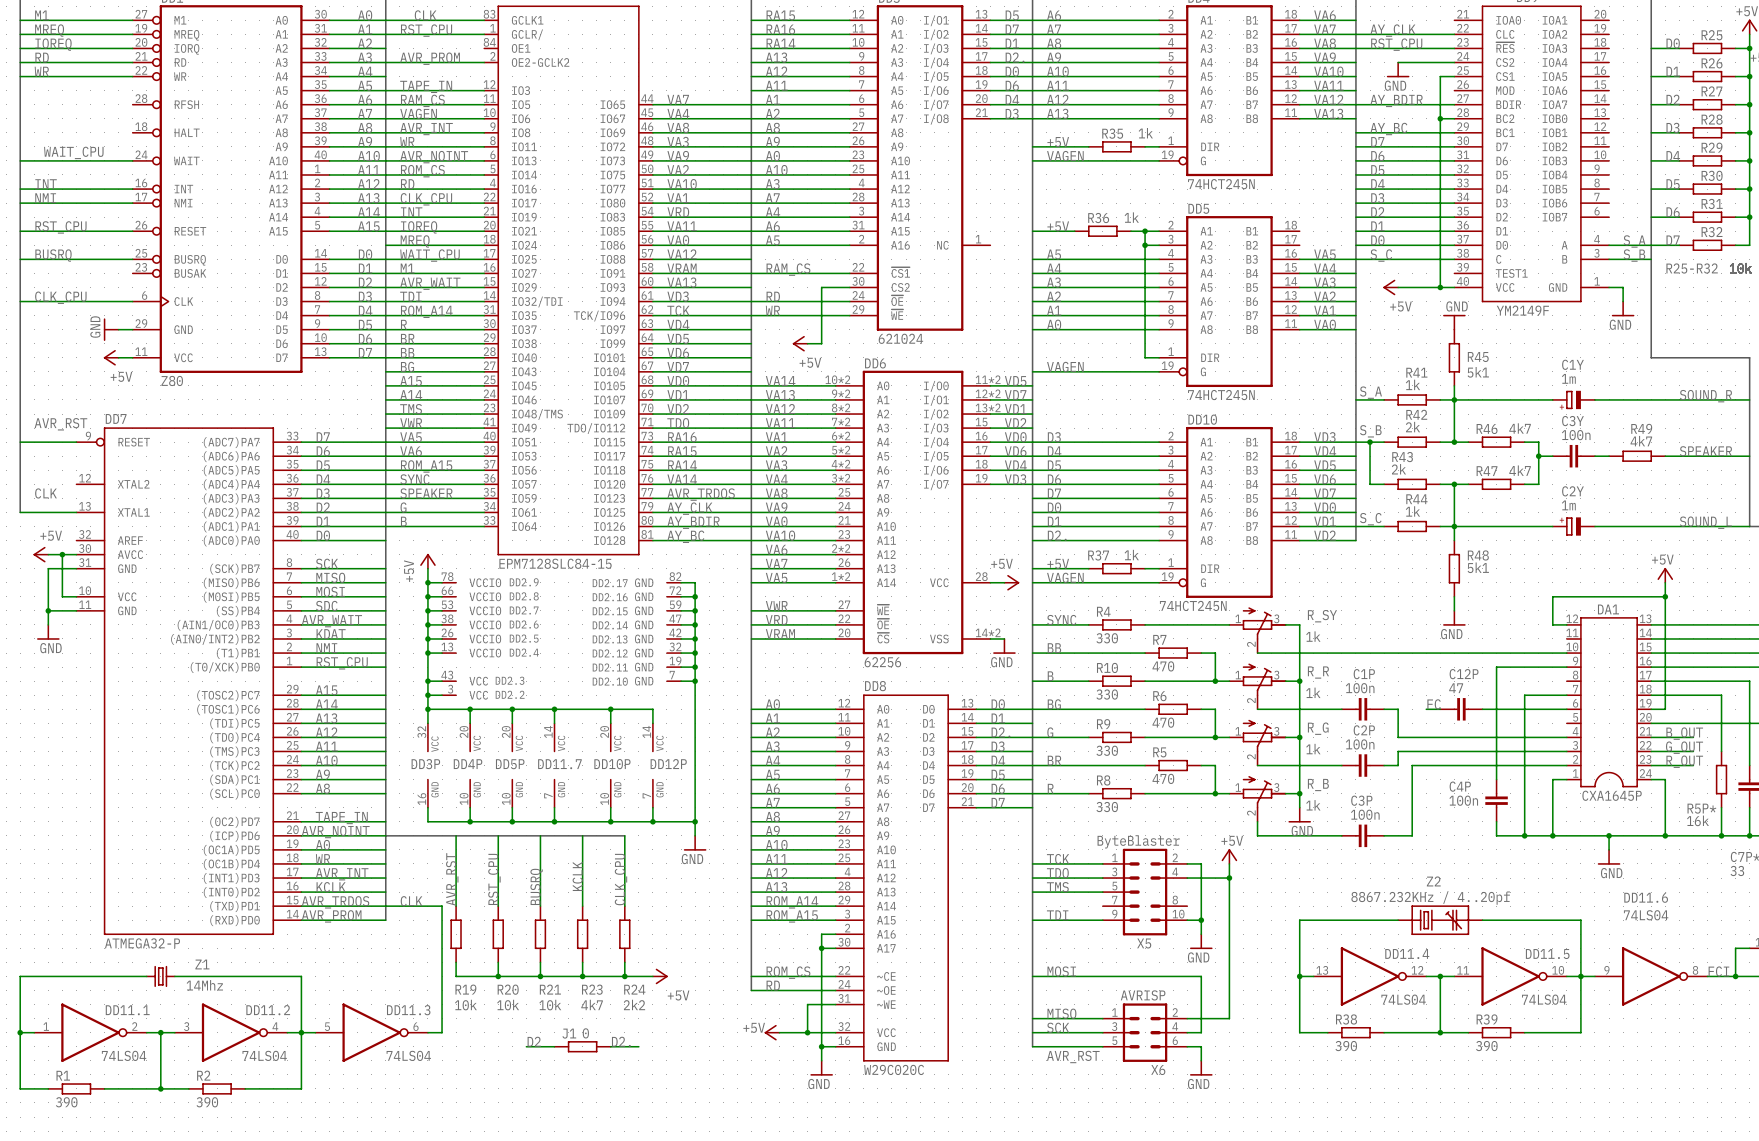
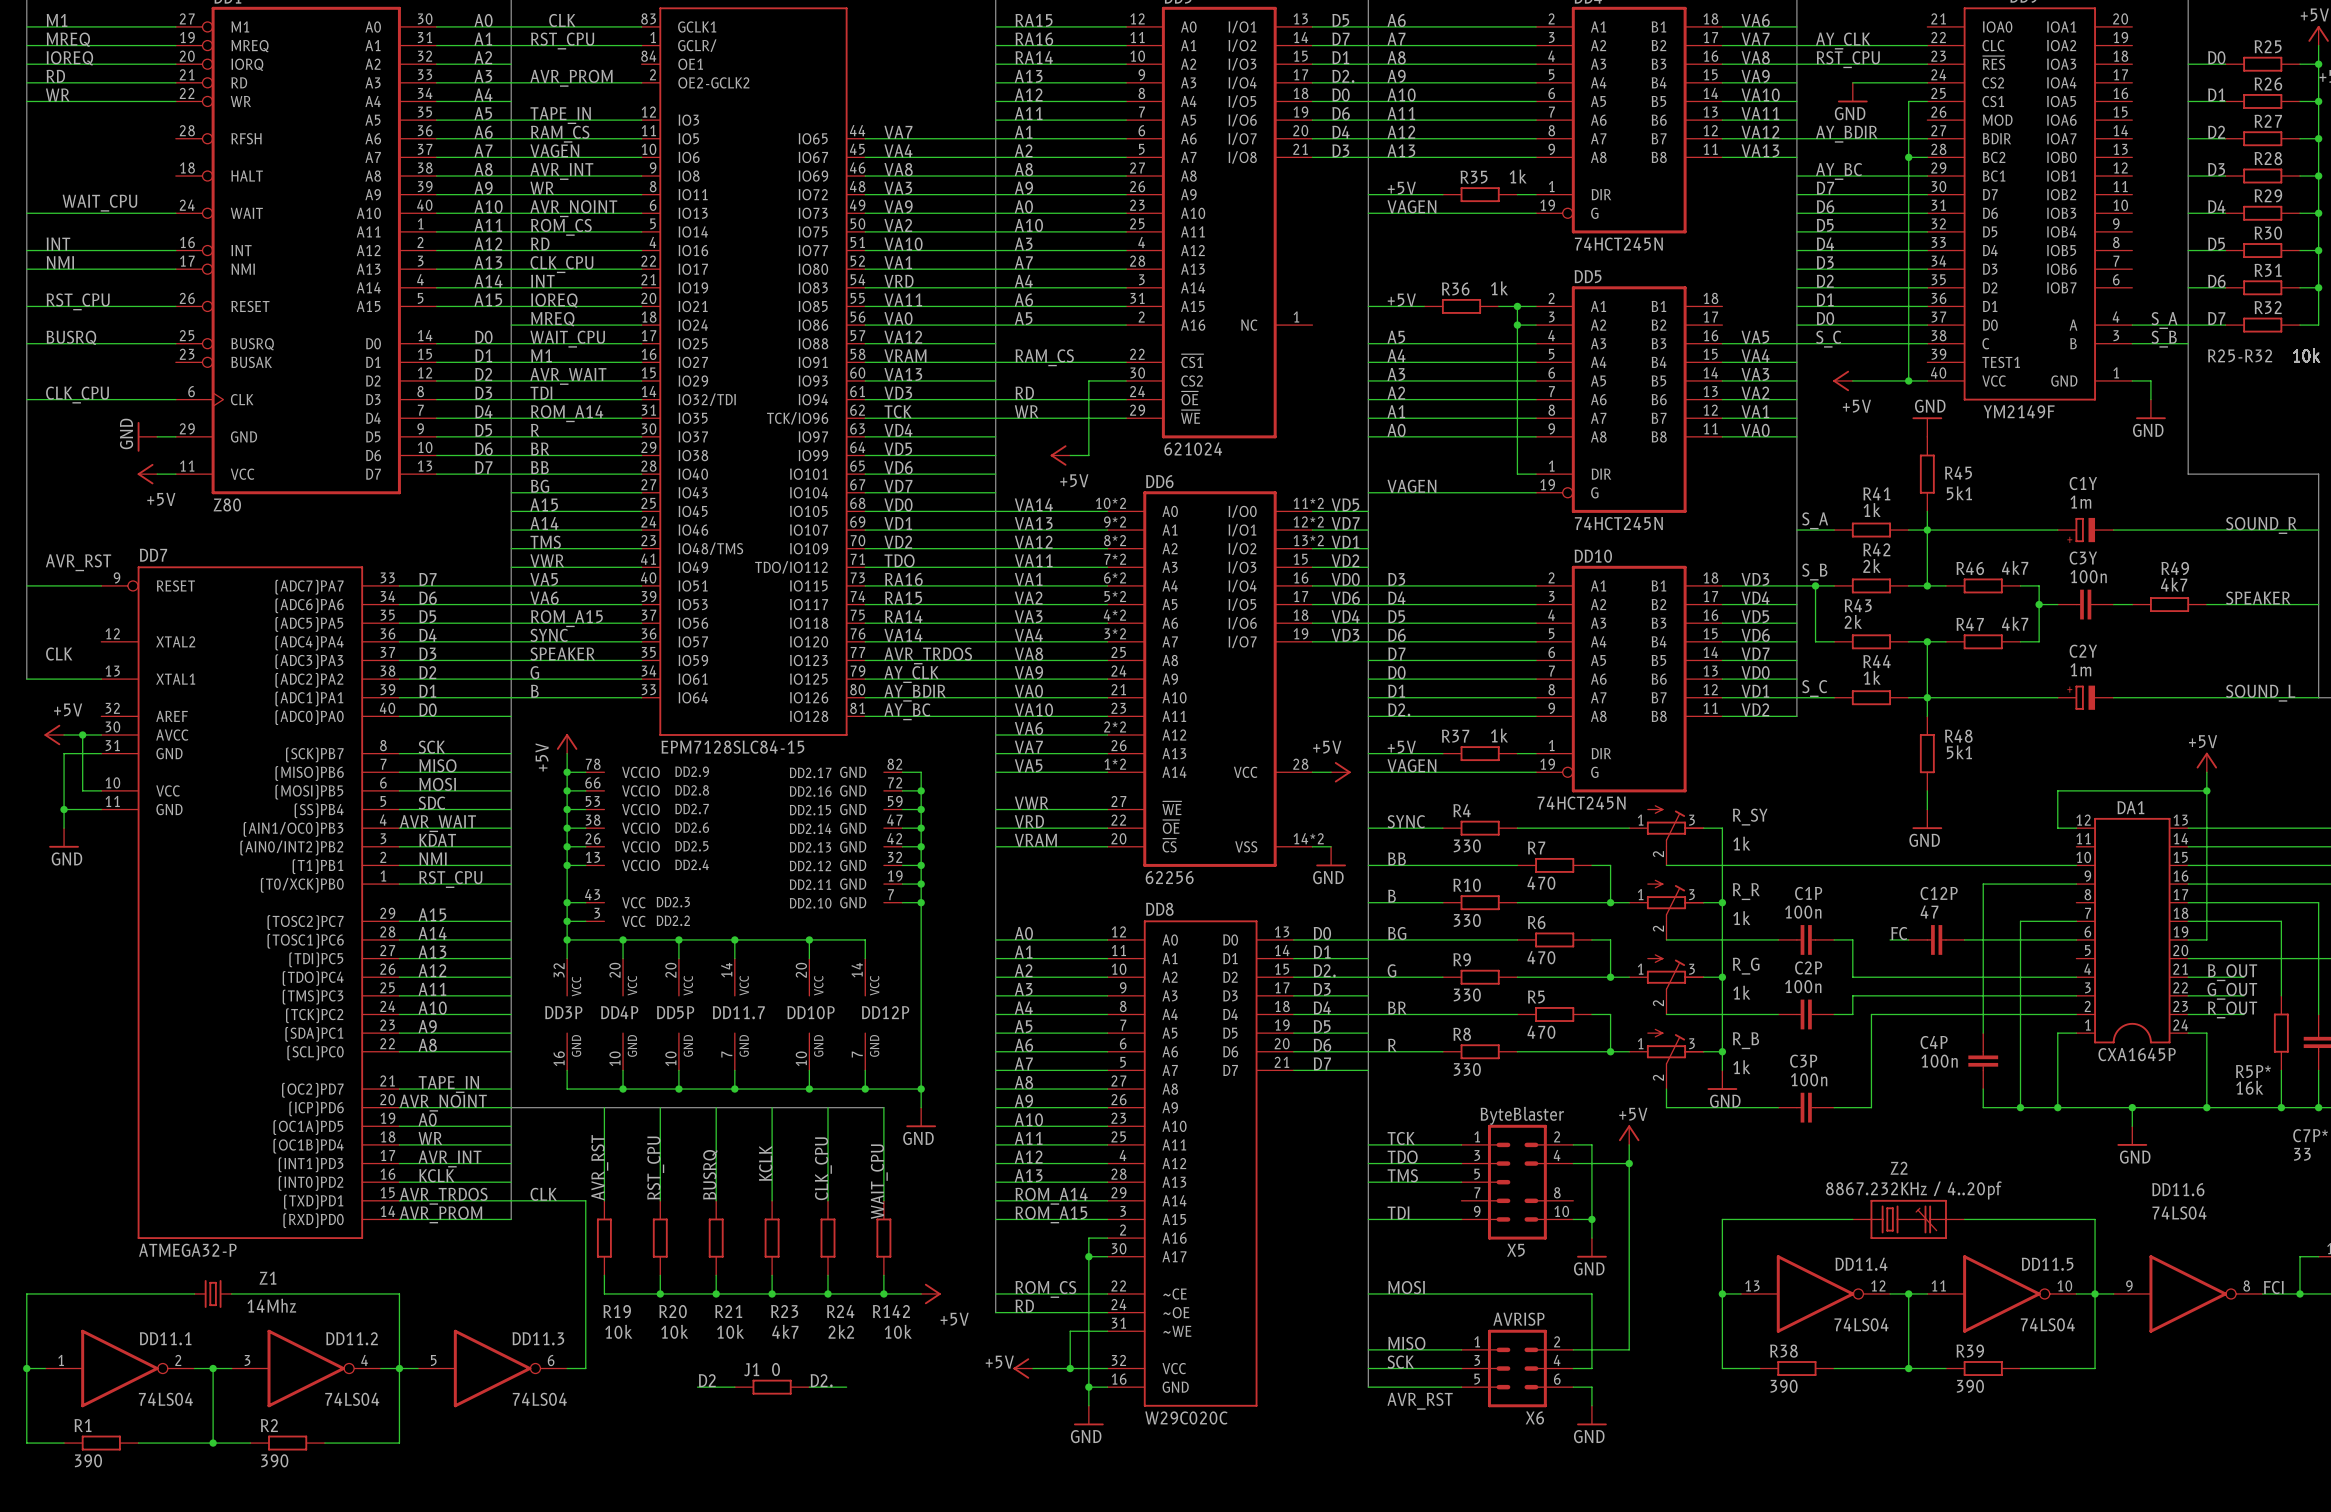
bus: none -> (827, 1107) (883, 1107)
wire: none -> (883, 1107) (883, 1200)
label: none -> WAIT_CPU (879, 1181)
R142: none -> 10k (883, 1238)
wire: none -> (883, 1275) (883, 1293)
wire: none -> (865, 1293) (921, 1293)
power symbol position: +5V (660, 976) -> +5V (930, 1293)
junction: none -> (883, 1293)

